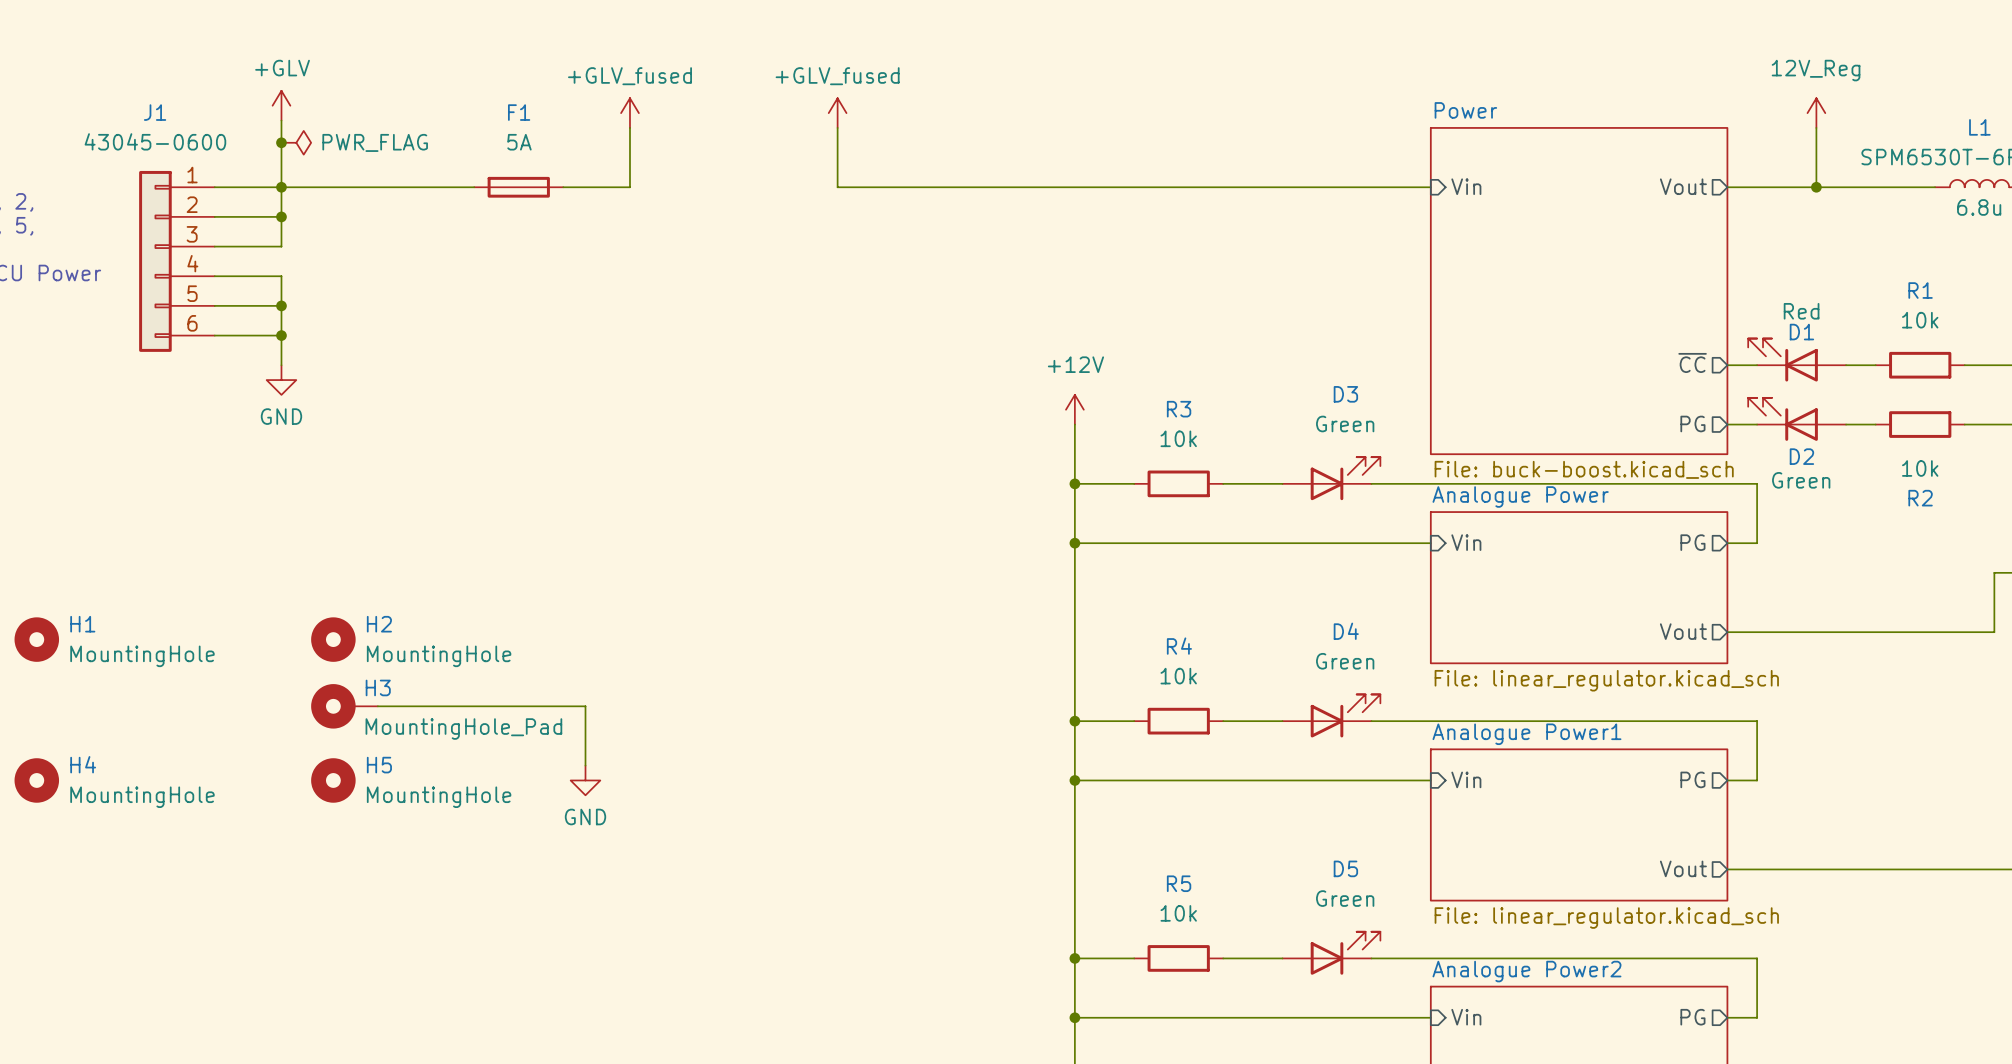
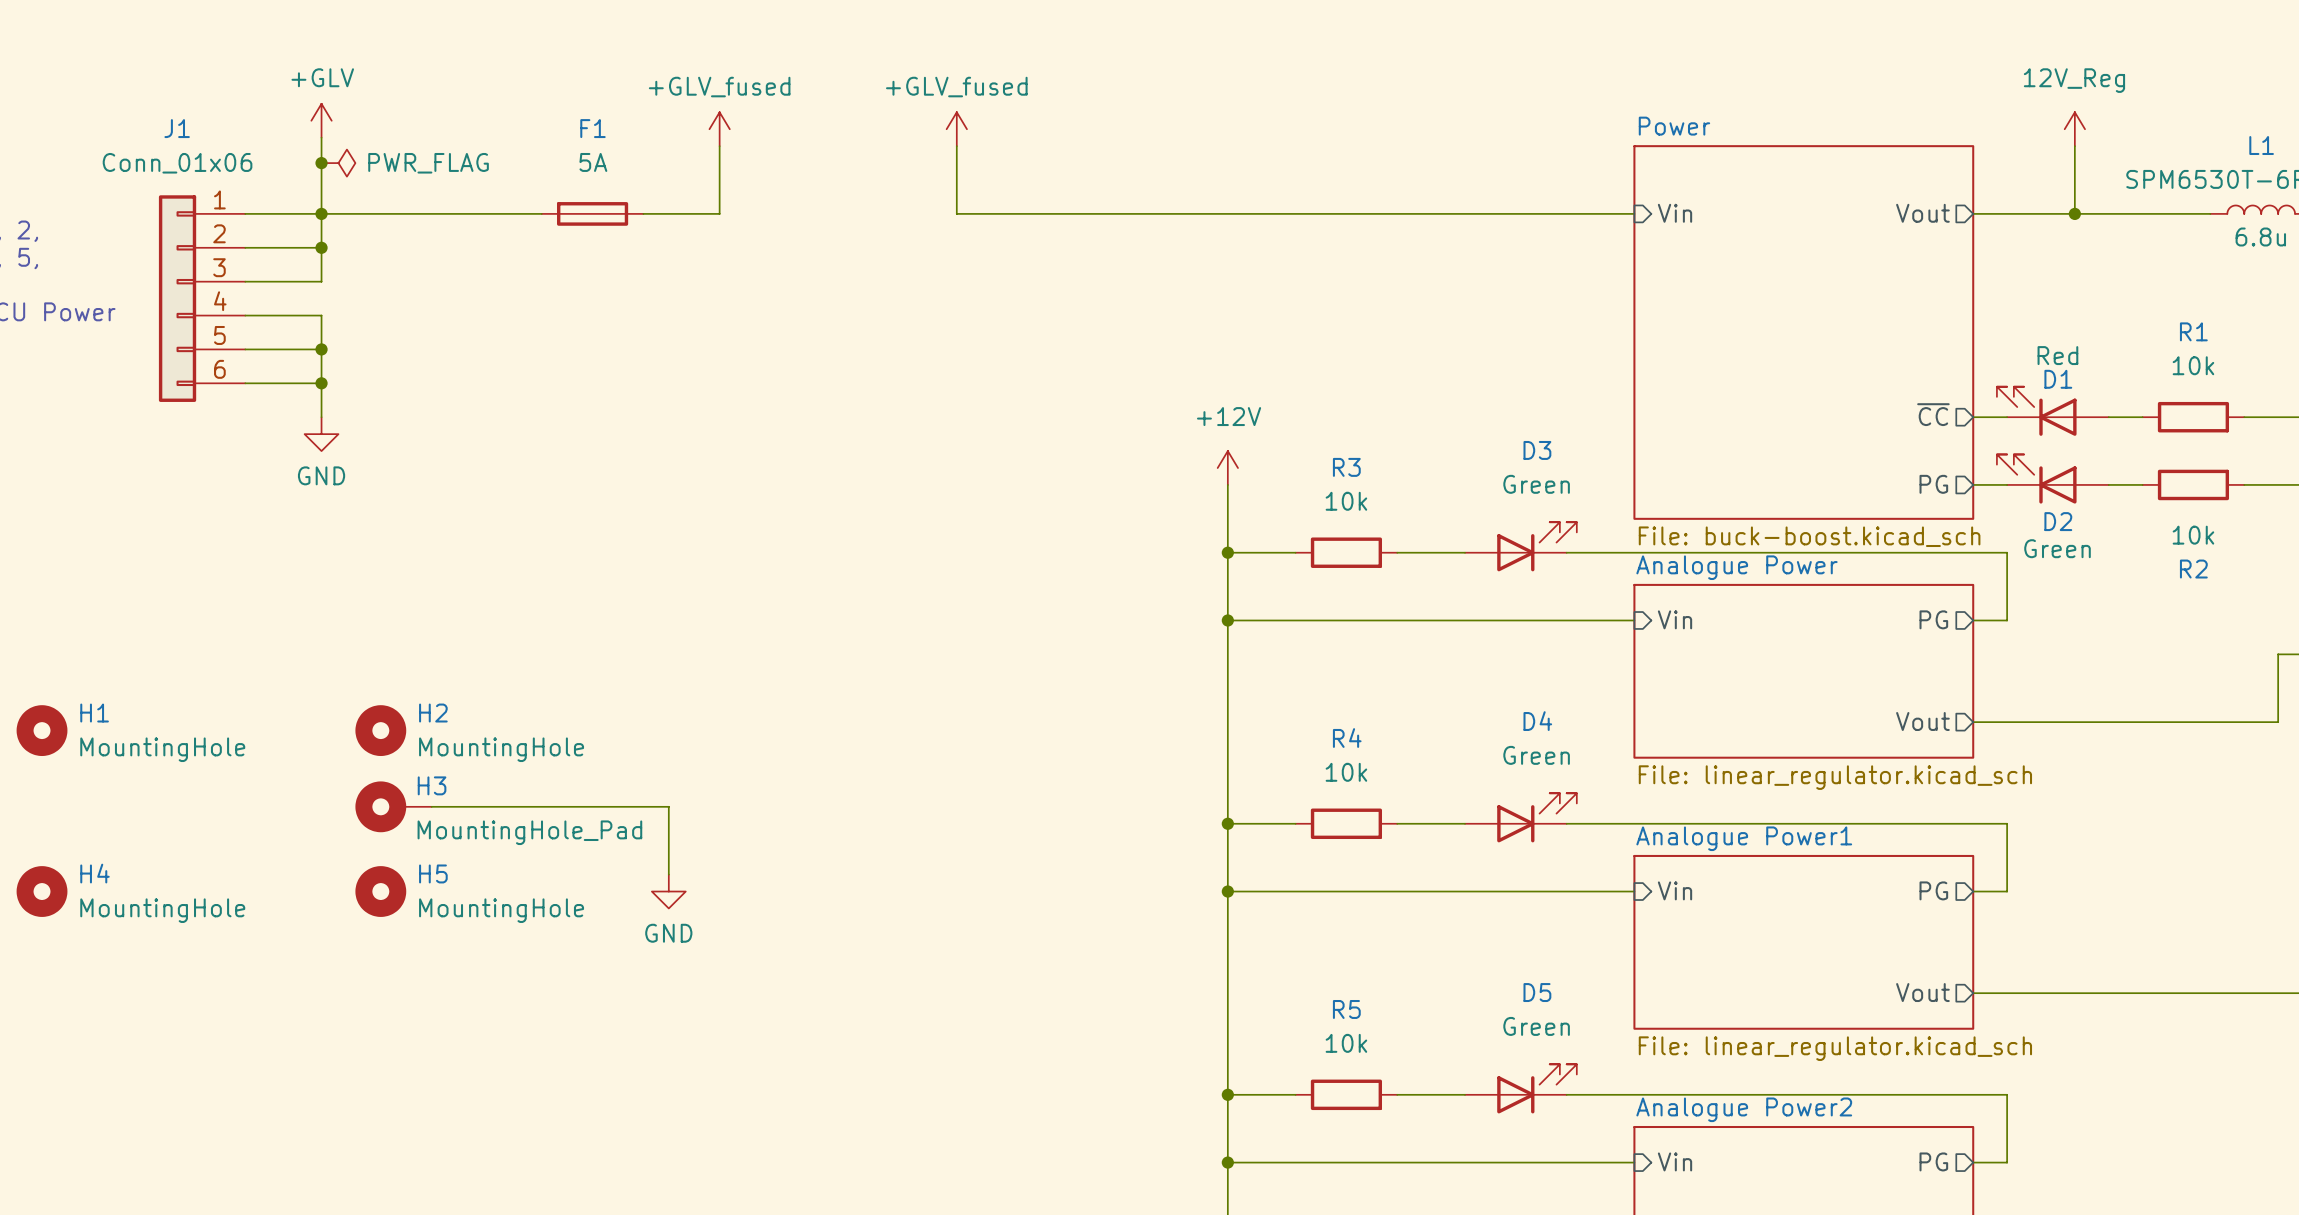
J1 value: 43045-0600 (155, 141) -> Conn_01x06 (177, 163)

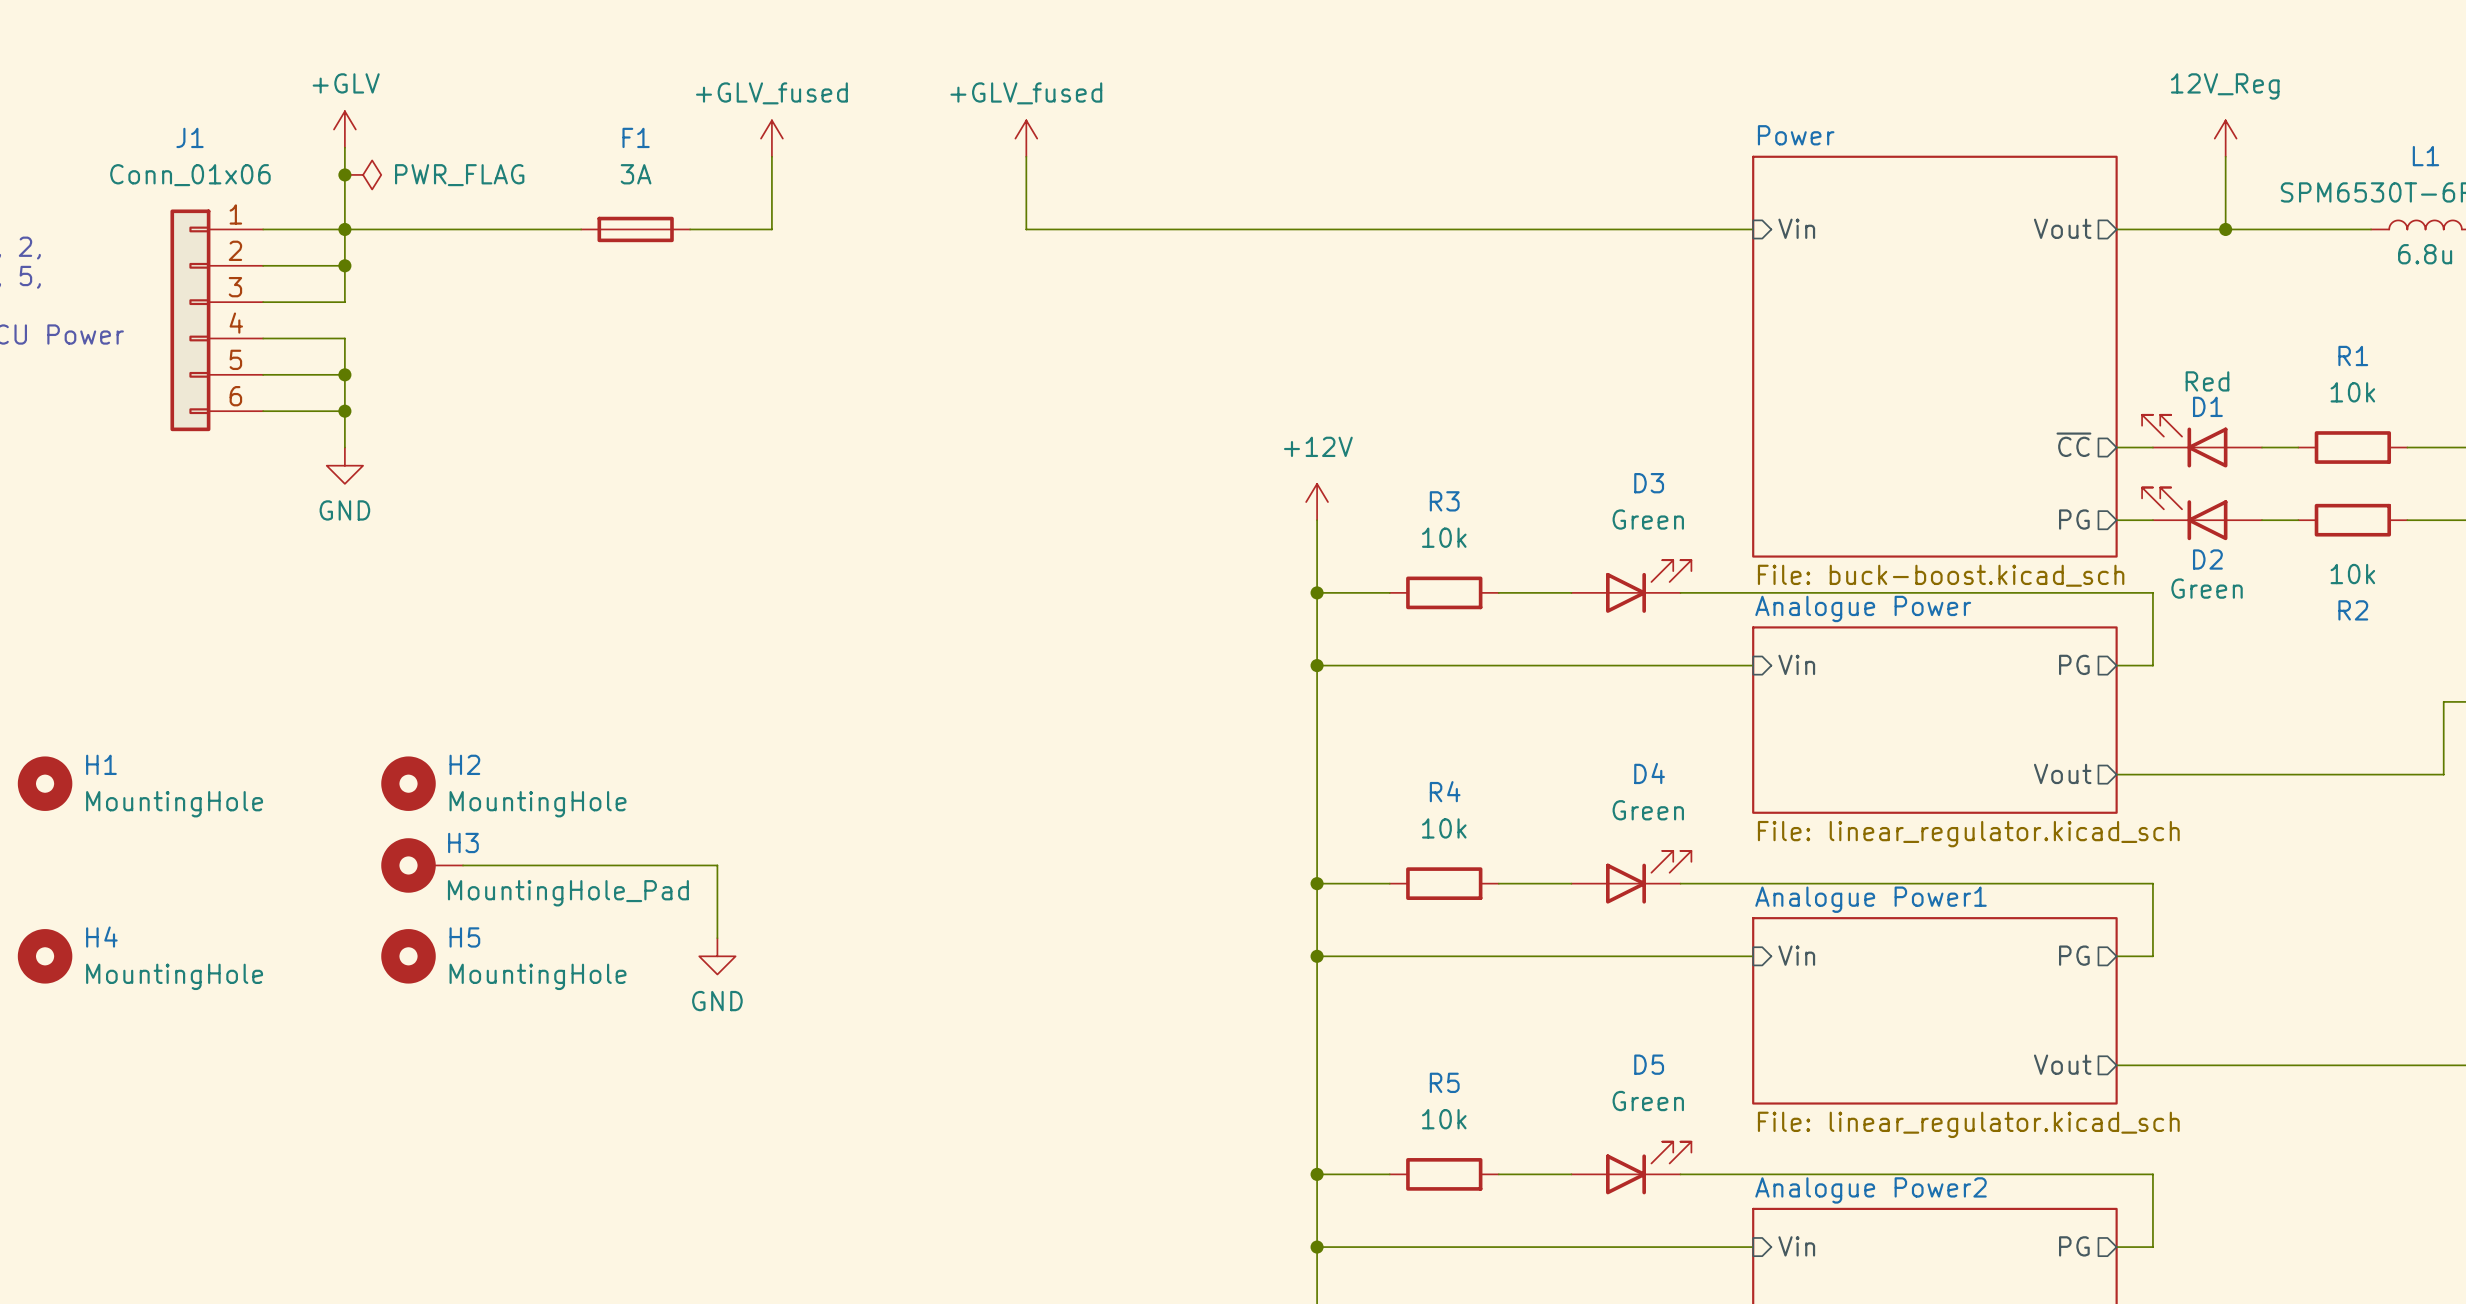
F1 value: 5A (593, 162) -> 3A (636, 174)

